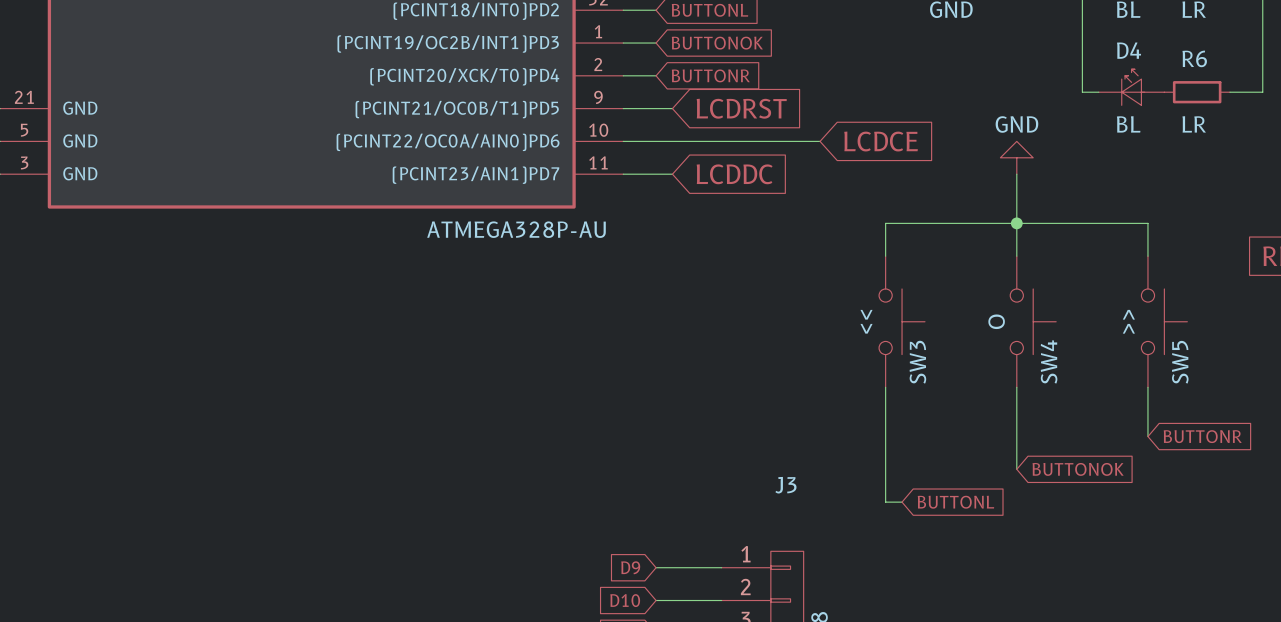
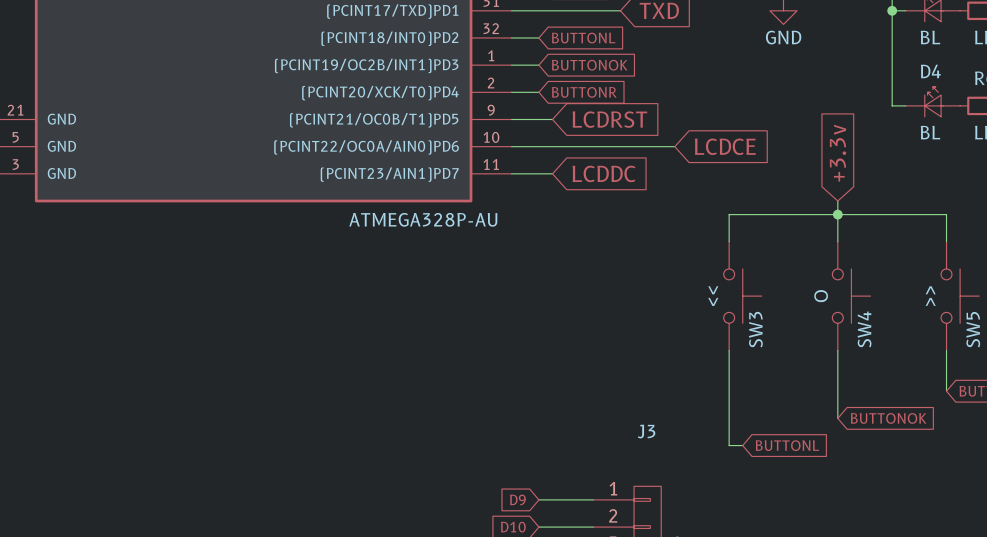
global label: none -> +3.3v (838, 153)
power symbol: GND (1016, 157) -> none
wire: (1016, 174) (1016, 206) -> none

